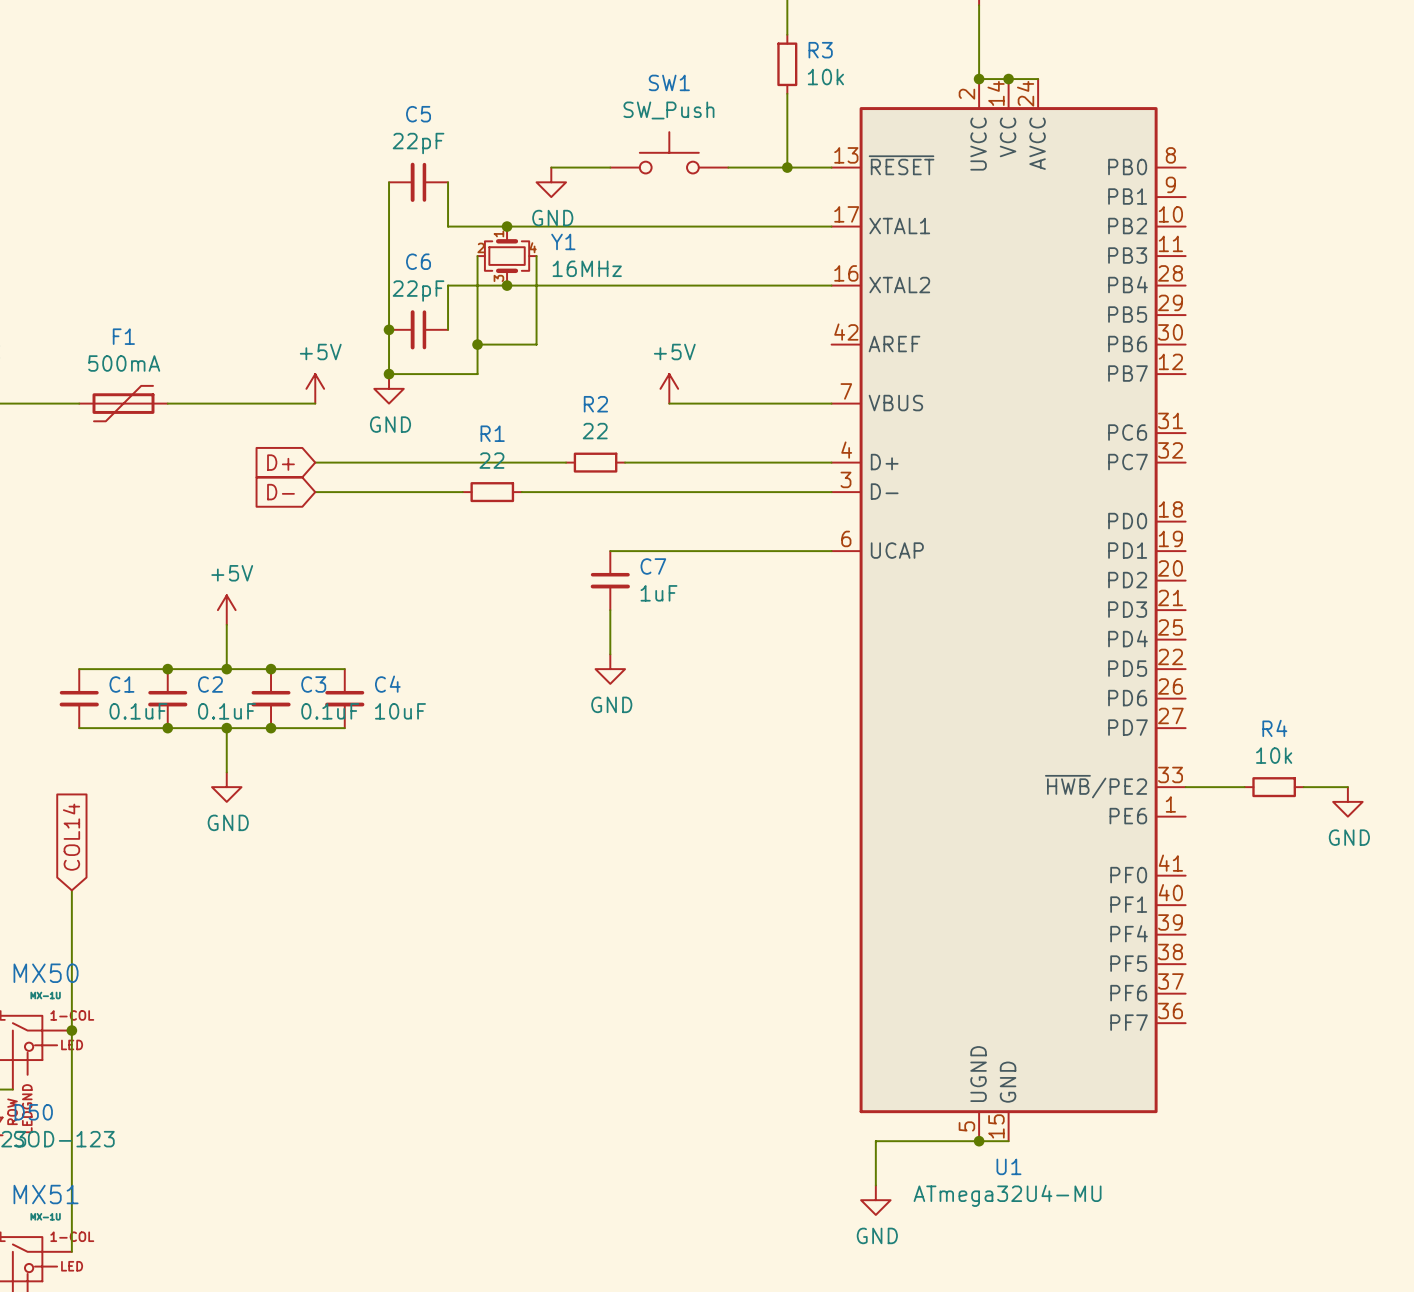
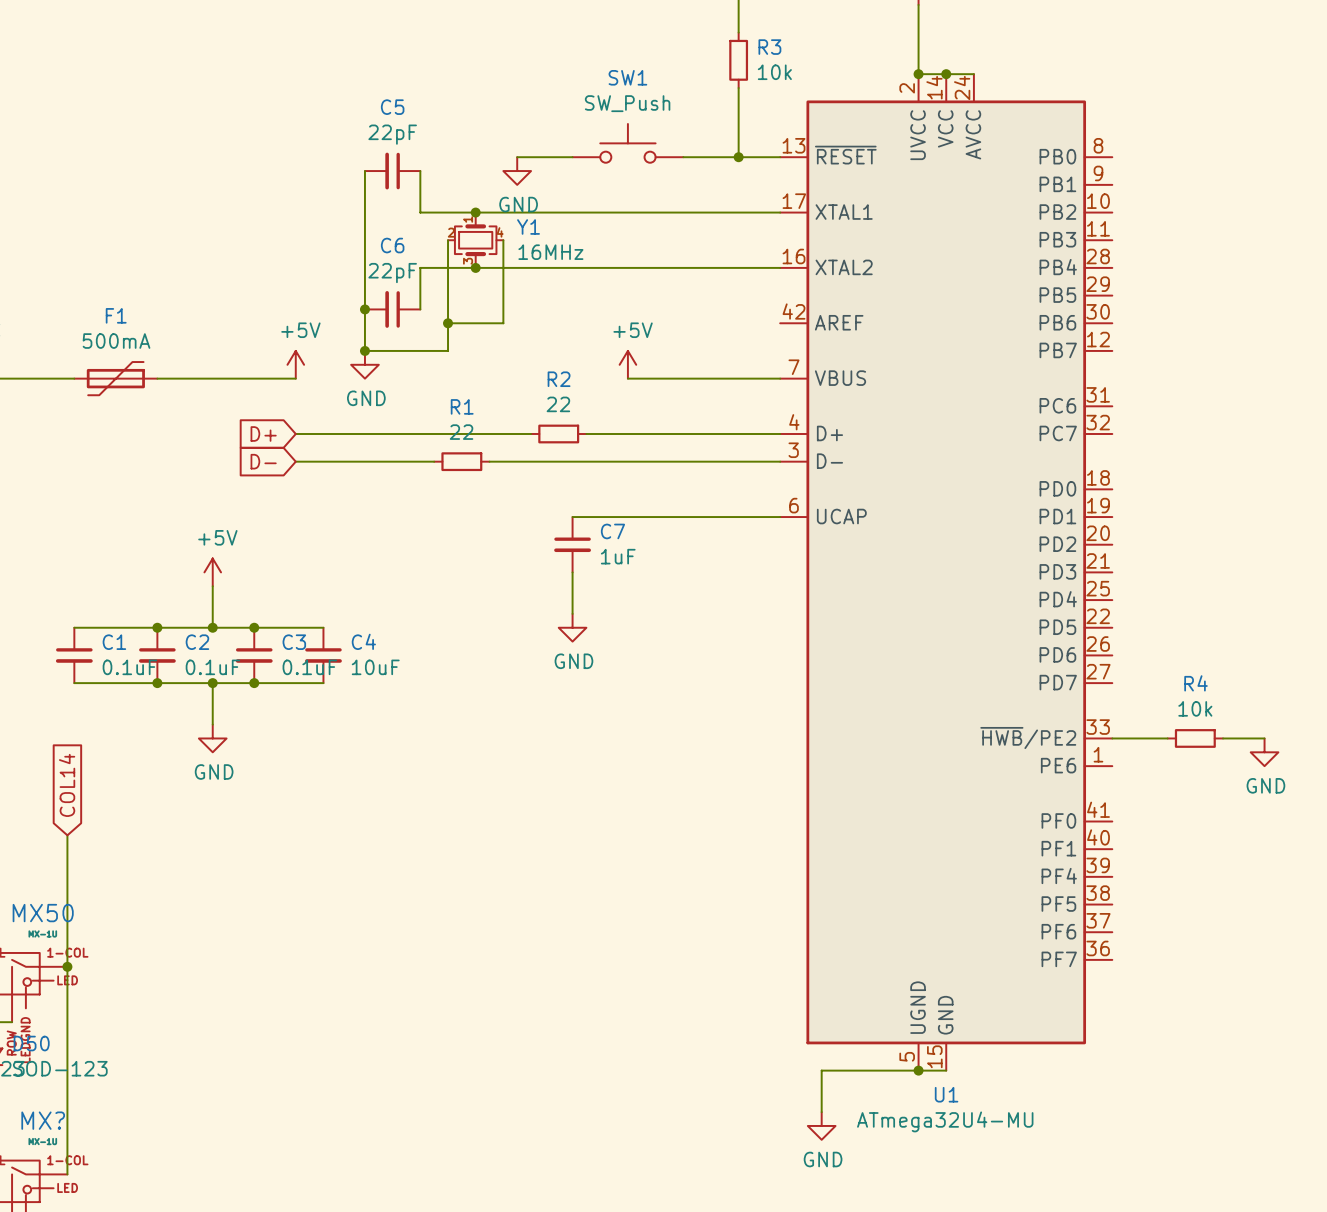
MX51 name: MX51 (46, 1194) -> MX? (43, 1120)

